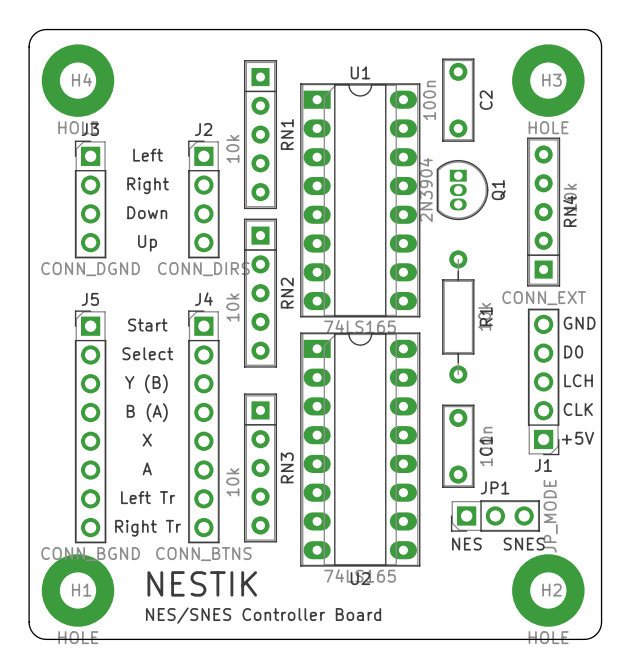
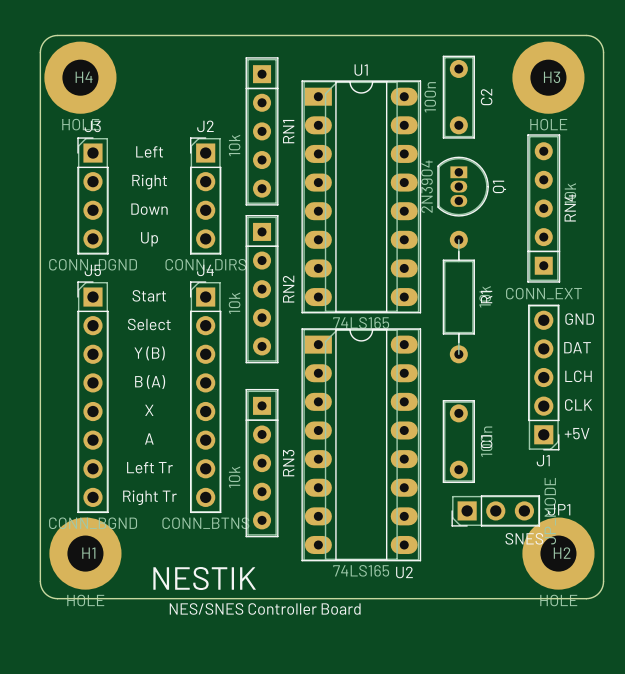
board edge: (46, 29) (584, 29) (596, 34) (601, 46) (601, 622) (596, 634) (584, 639) (46, 639) (34, 634) (29, 622) (29, 46) (34, 34) (46, 29) -> (57, 35) (45, 40) (40, 52) (40, 581) (45, 593) (57, 598) (586, 598) (598, 593) (603, 581) (603, 52) (598, 40) (586, 35) (57, 35)
R1 position: (458, 316) -> (458, 297)
text position: Start (147, 325) -> Start (149, 295)
text: D0 (573, 351) -> DAT (577, 347)
text position: Select (147, 353) -> Select (149, 324)
text position: Y (B) (146, 383) -> Y (B) (149, 353)
text position: B (A) (147, 412) -> B (A) (150, 382)
J5 position: (90, 426) -> (92, 397)
J4 position: (203, 426) -> (205, 397)
text position: X (147, 440) -> X (149, 410)
text position: A (147, 468) -> A (149, 438)
JP1 name position: JP1 (495, 487) -> JP1 (559, 509)
text position: Left Tr (148, 497) -> Left Tr (149, 467)
text position: Right Tr (148, 528) -> Right Tr (149, 497)
text: NES (466, 544) -> none
U2 name position: U2 (360, 578) -> U2 (404, 572)
H1 position: (78, 590) -> (85, 553)
H2 position: (548, 590) -> (558, 553)

